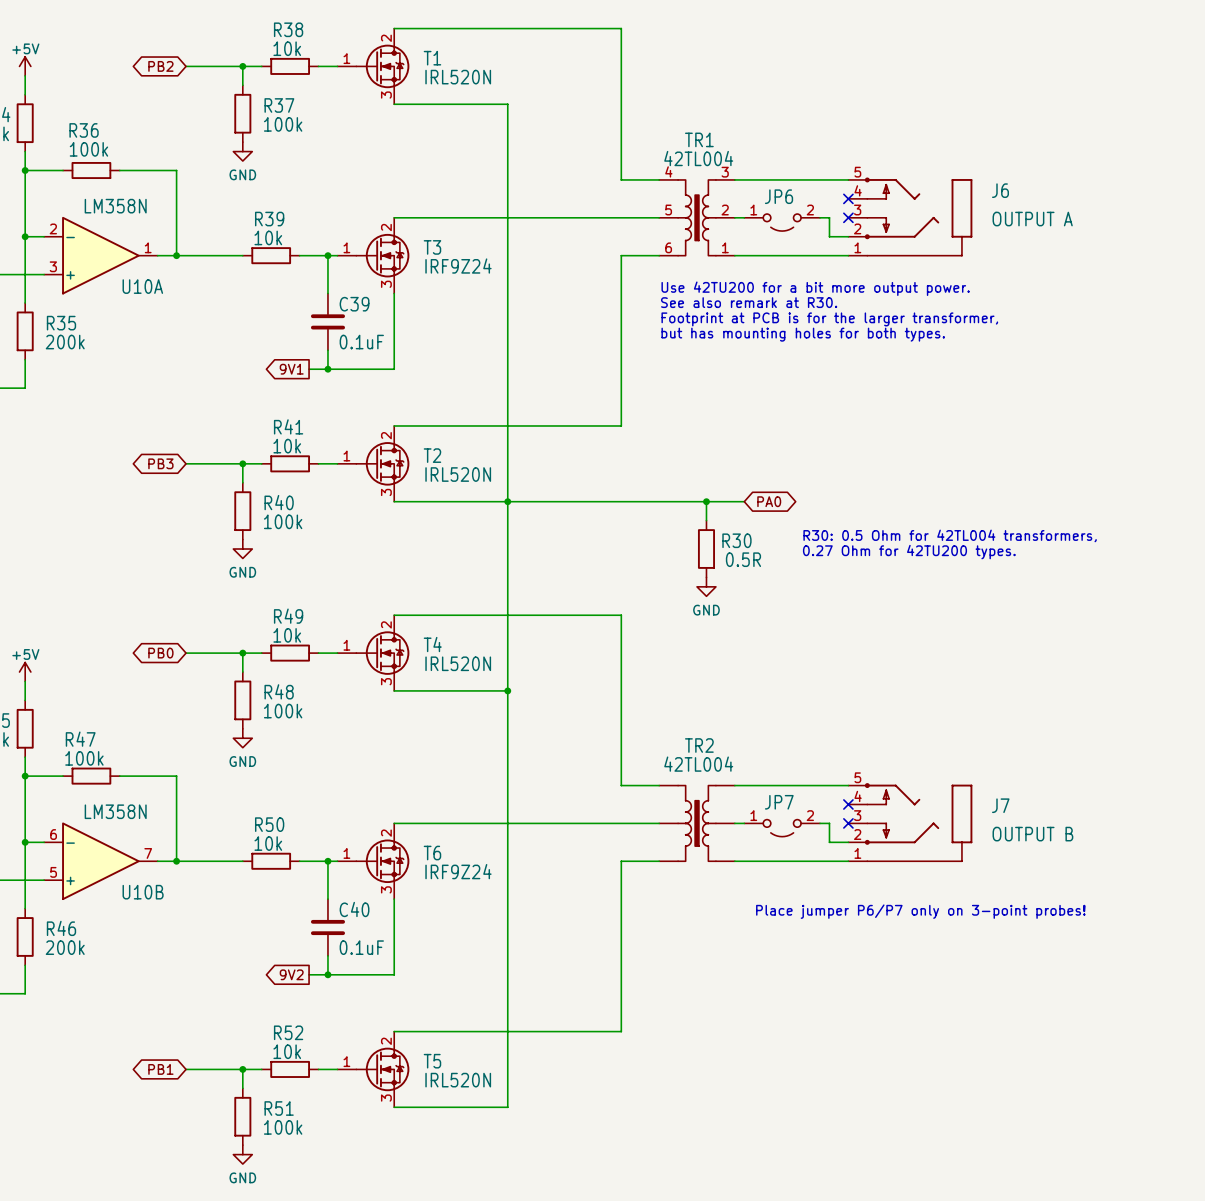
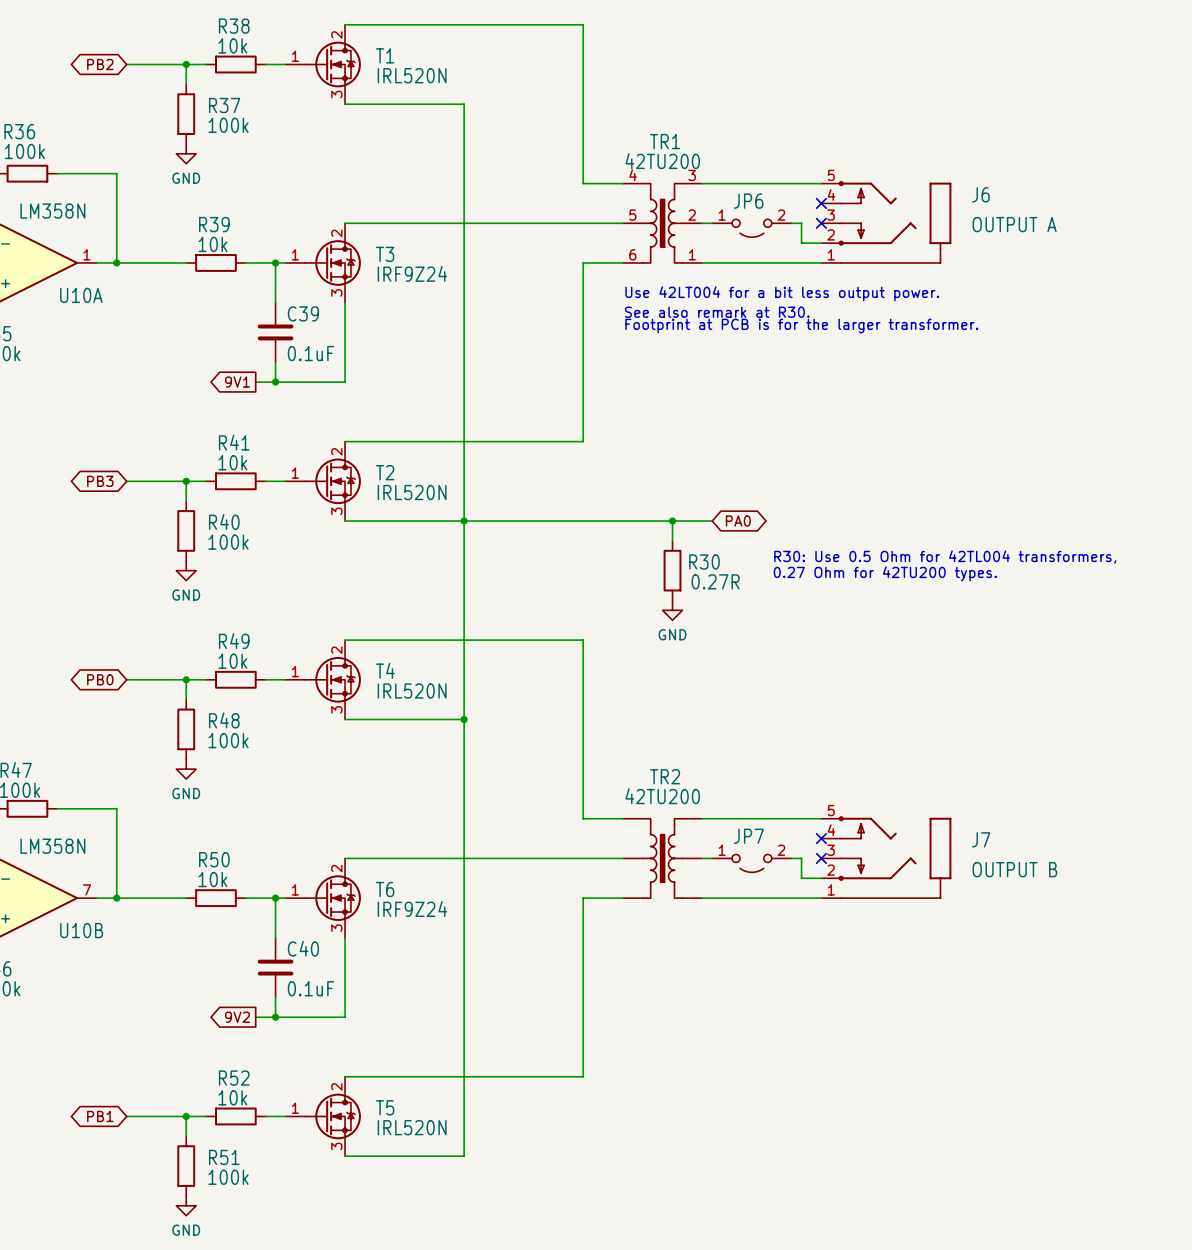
TR1 value: 42TL004 (698, 158) -> 42TU200 (662, 161)
text: Use 42TU200 for a bit more output power. (815, 288) -> Use 42LT004 for a bit less output power. (782, 293)
text: Footprint at PCB is for the larger transformer, (829, 319) -> Footprint at PCB is for the larger transformer. (801, 325)
text: but has mounting holes for both types. (803, 334) -> none
text: R30: 0.5 Ohm for 42TL004 transformers, (950, 535) -> R30: Use 0.5 Ohm for 42TL004 transformers, (945, 556)
R30 value: 0.5R (743, 559) -> 0.27R (715, 581)
TR2 value: 42TL004 (698, 764) -> 42TU200 (662, 796)
text: Place jumper P6/P7 only on 3-point probes! (920, 911) -> none

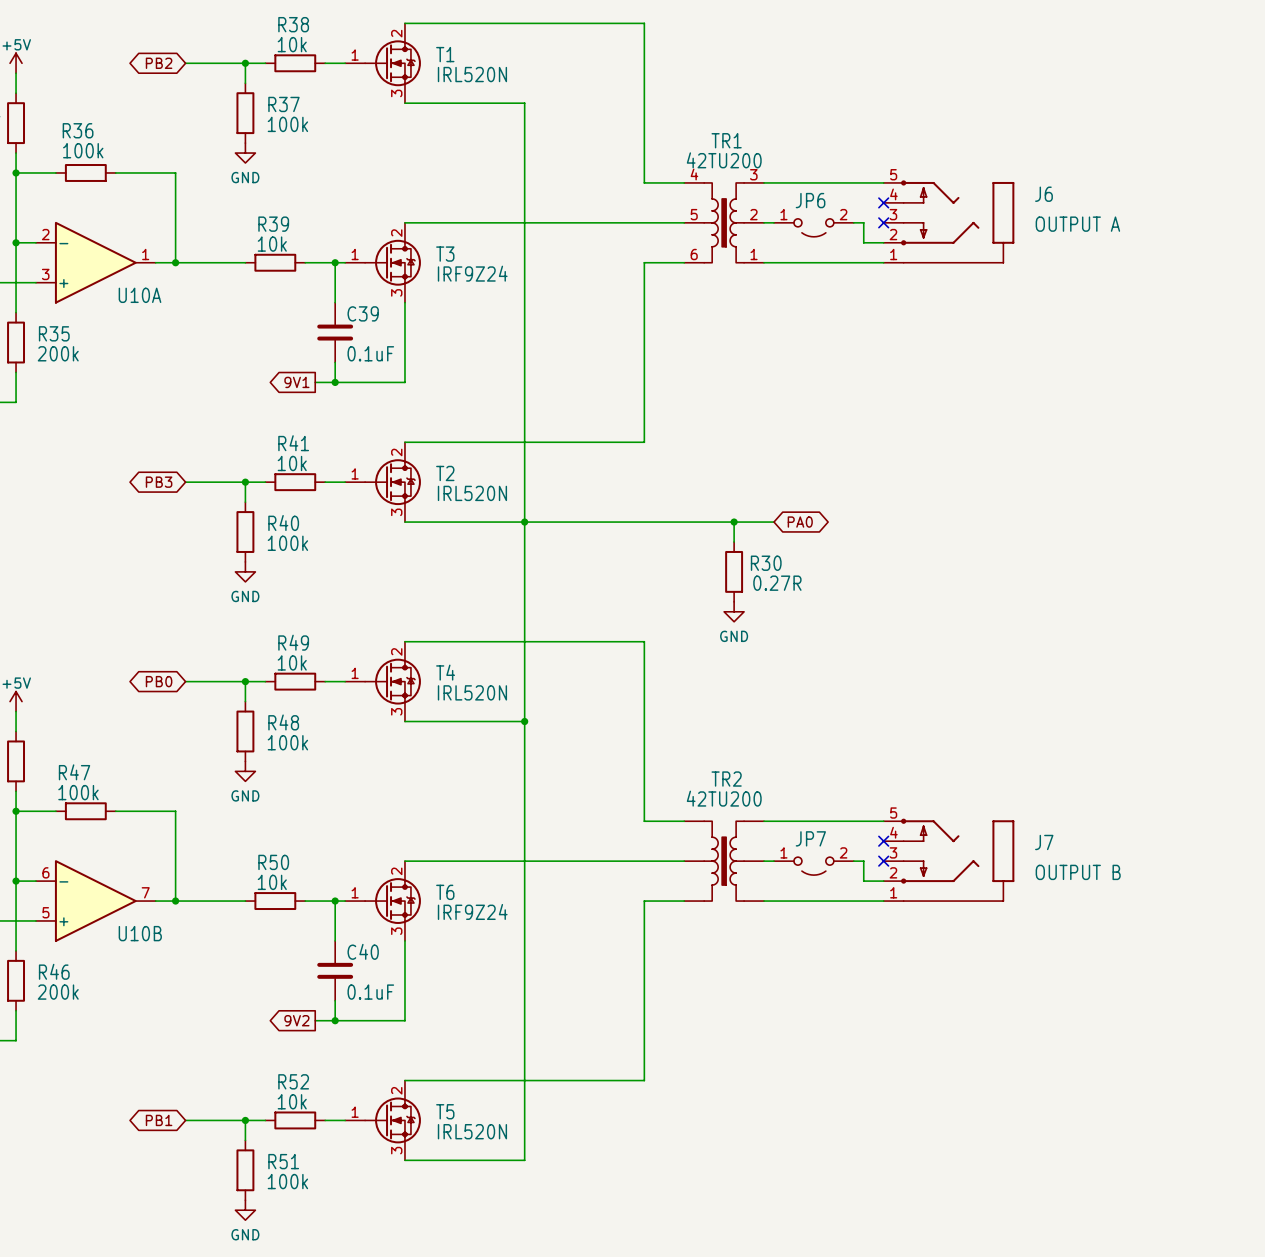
U10A value: LM358N (52, 211) -> none
text: Use 42LT004 for a bit less output power. (782, 293) -> none
text: See also remark at R30. (717, 312) -> none
text: Footprint at PCB is for the larger transformer. (801, 325) -> none
text: R30: Use 0.5 Ohm for 42TL004 transformers, (945, 556) -> none
text: 0.27 Ohm for 42TU200 types. (885, 573) -> none
U10B value: LM358N (52, 846) -> none

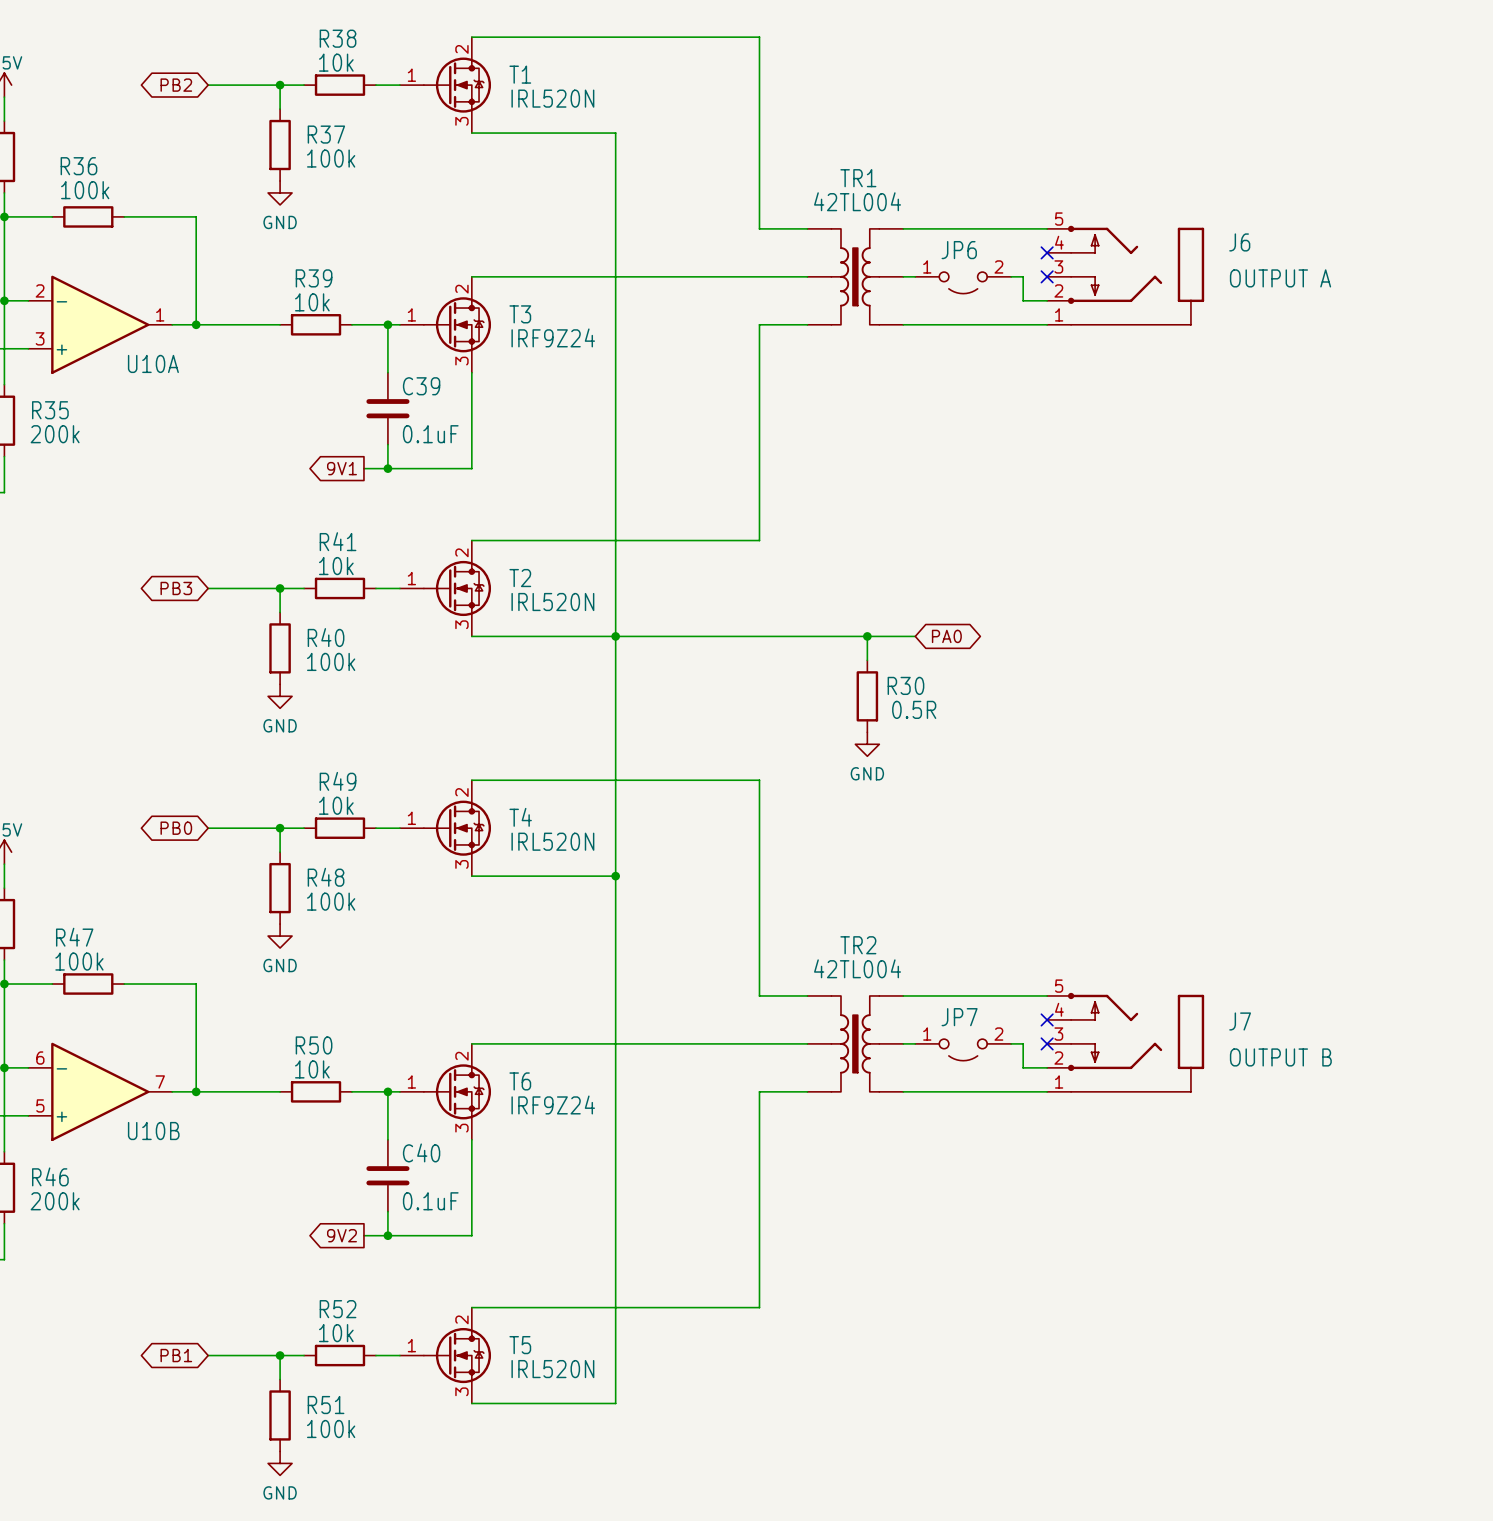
TR1 value: 42TU200 (724, 160) -> 42TL004 (857, 201)
TR1 pin number: 4 (694, 174) -> none
TR1 pin number: 3 (753, 174) -> none
TR1 pin number: 5 (694, 214) -> none
TR1 pin number: 2 (753, 214) -> none
TR1 pin number: 6 (694, 254) -> none
TR1 pin number: 1 (754, 254) -> none
R30 value: 0.27R (777, 583) -> 0.5R (914, 709)
TR2 value: 42TU200 (724, 798) -> 42TL004 (857, 968)

